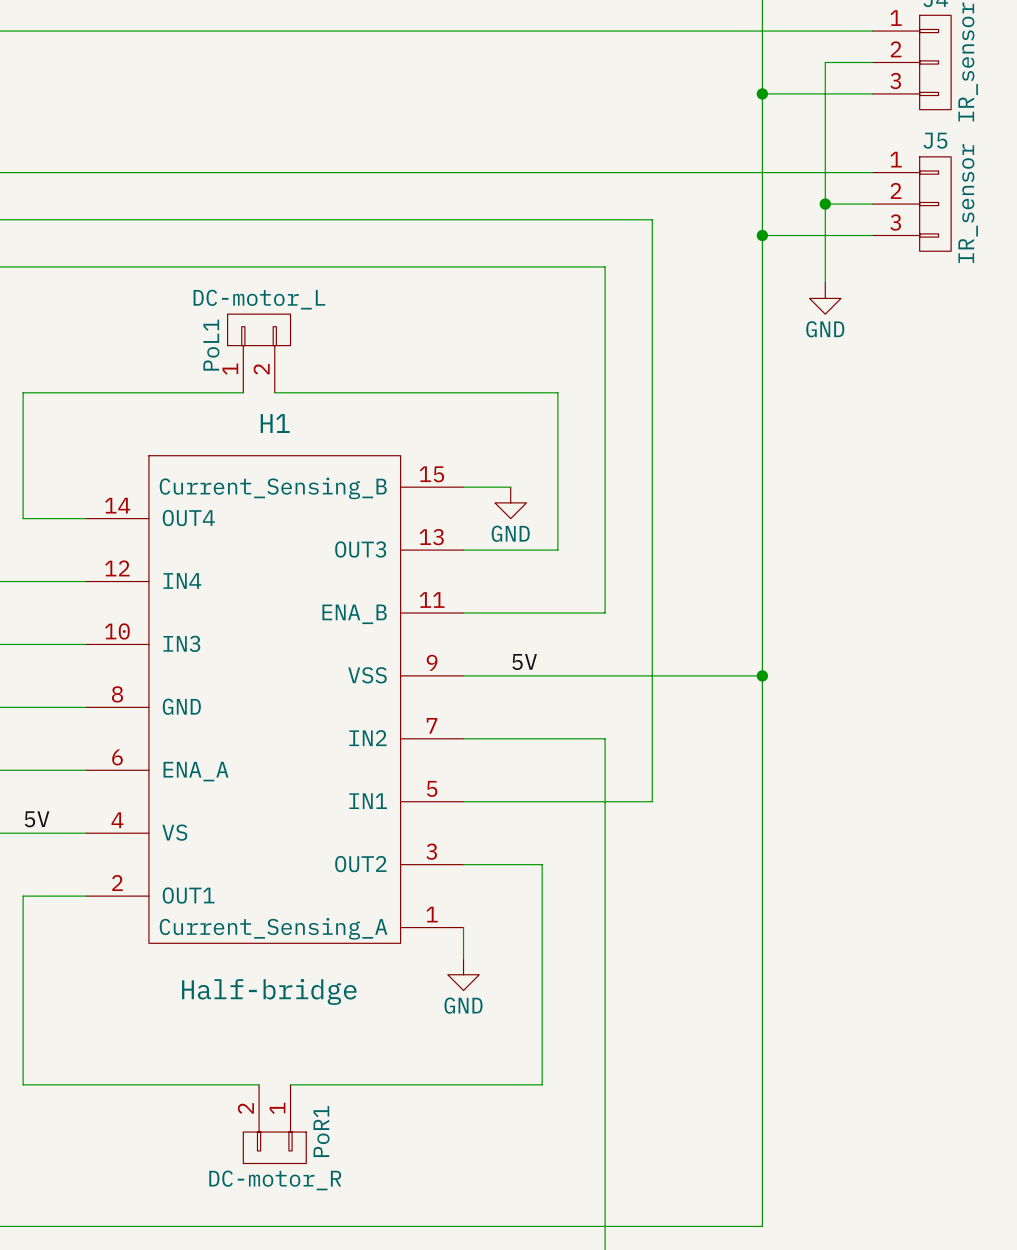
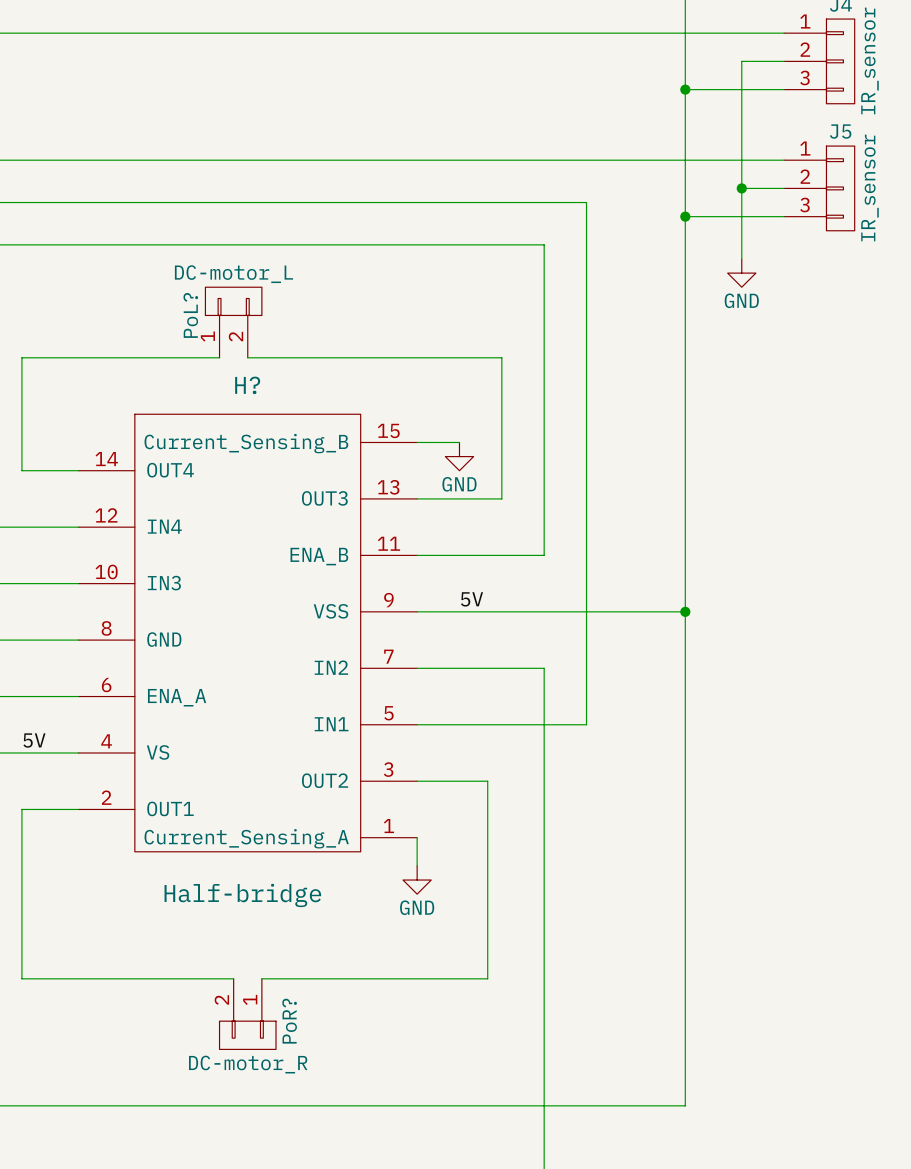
PoL1 name: PoL1 (211, 345) -> PoL? (190, 315)
H1 name: H1 (275, 423) -> H? (247, 385)
PoR1 name: PoR1 (321, 1131) -> PoR? (289, 1021)

